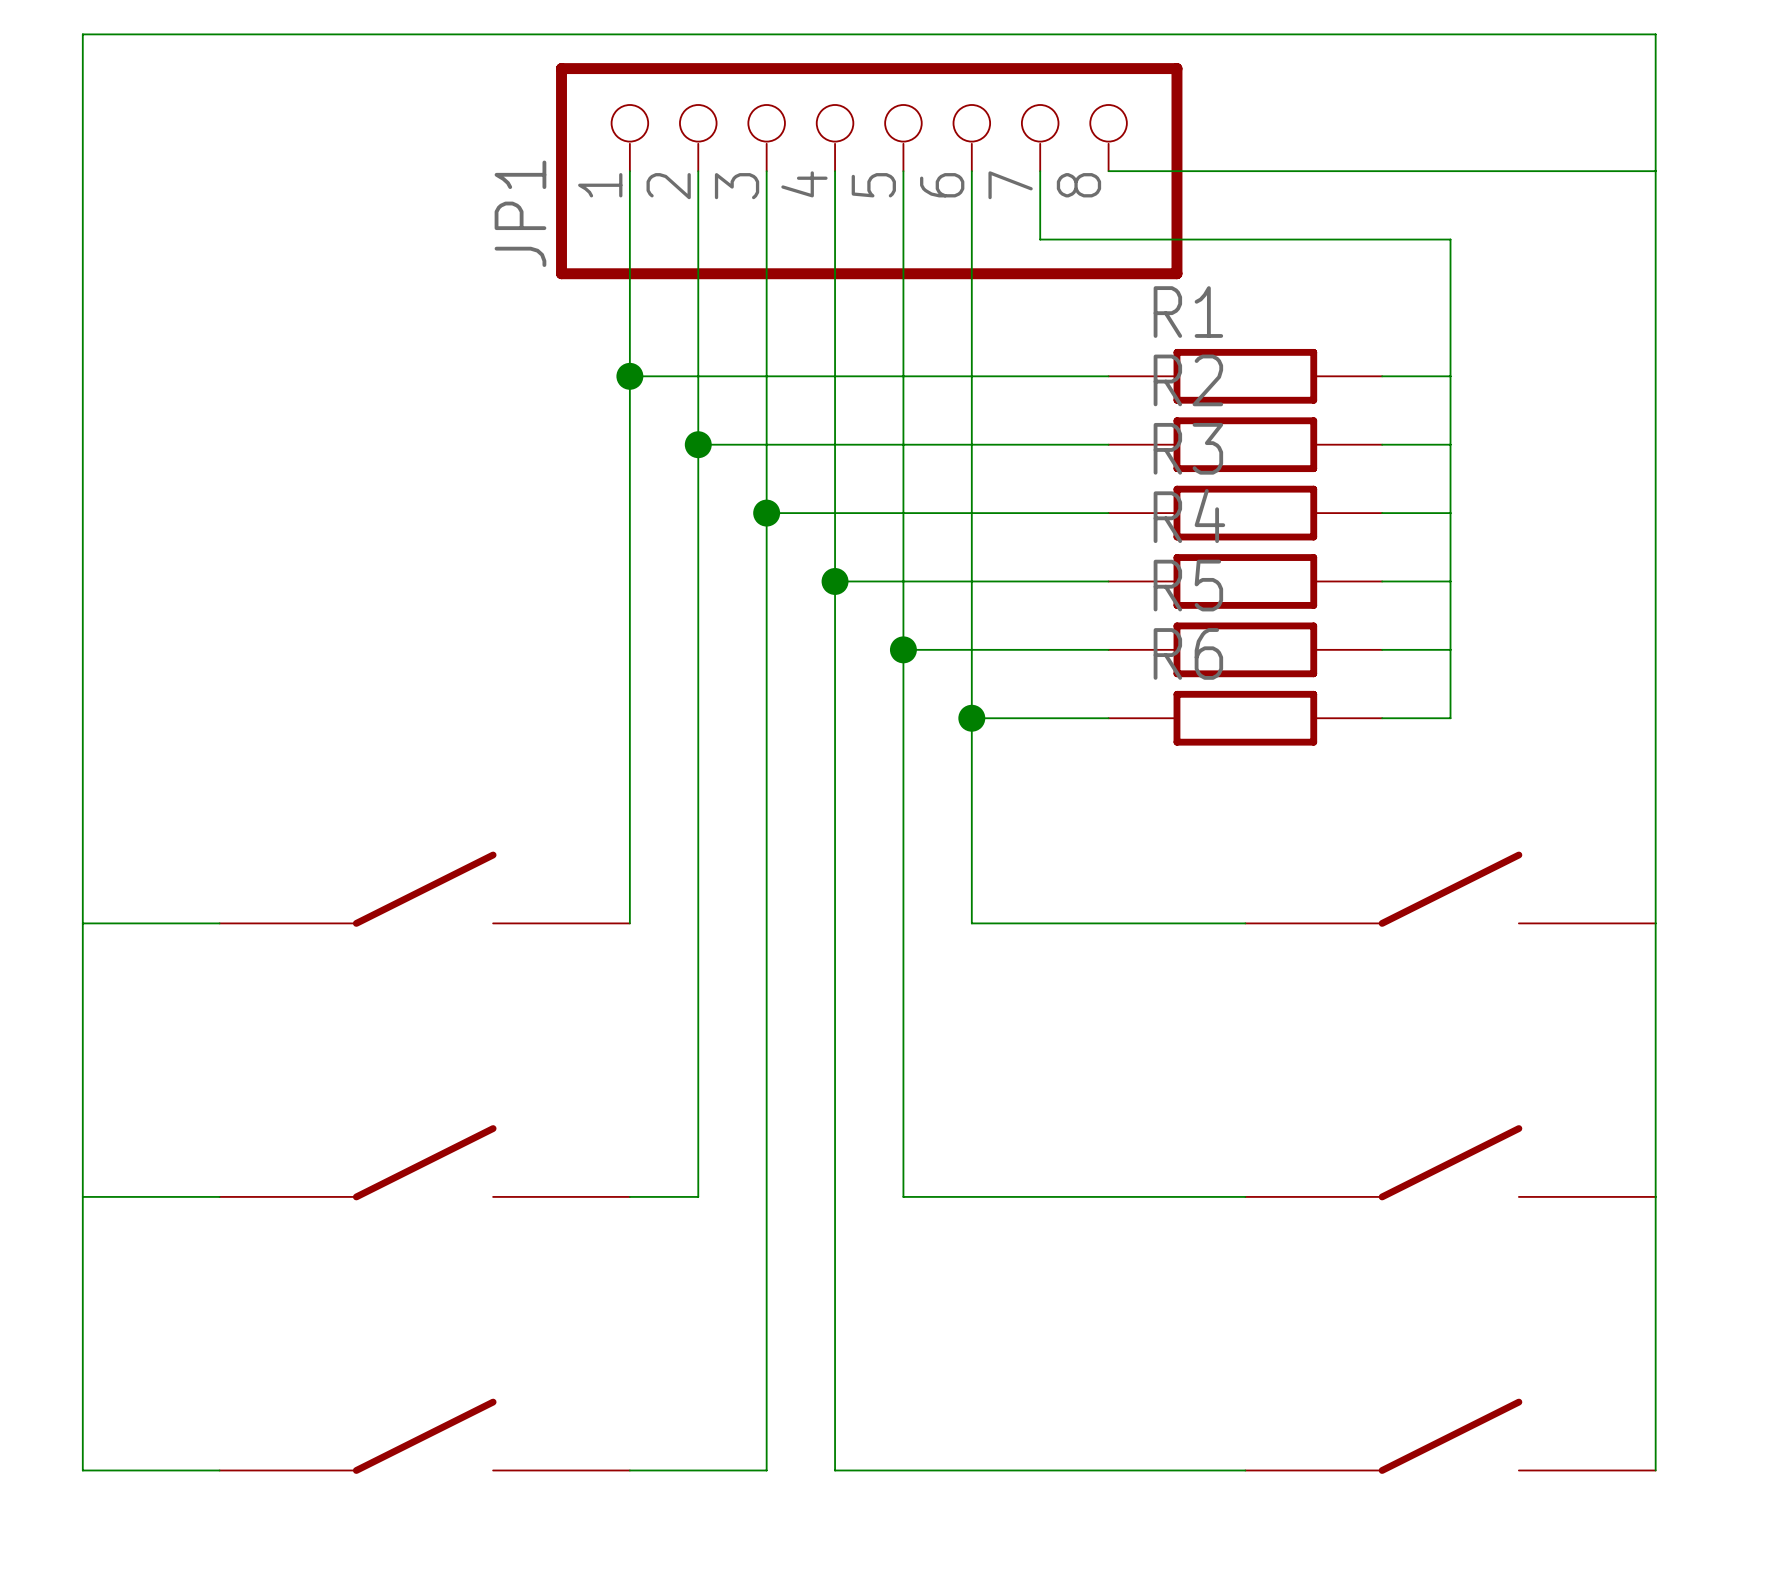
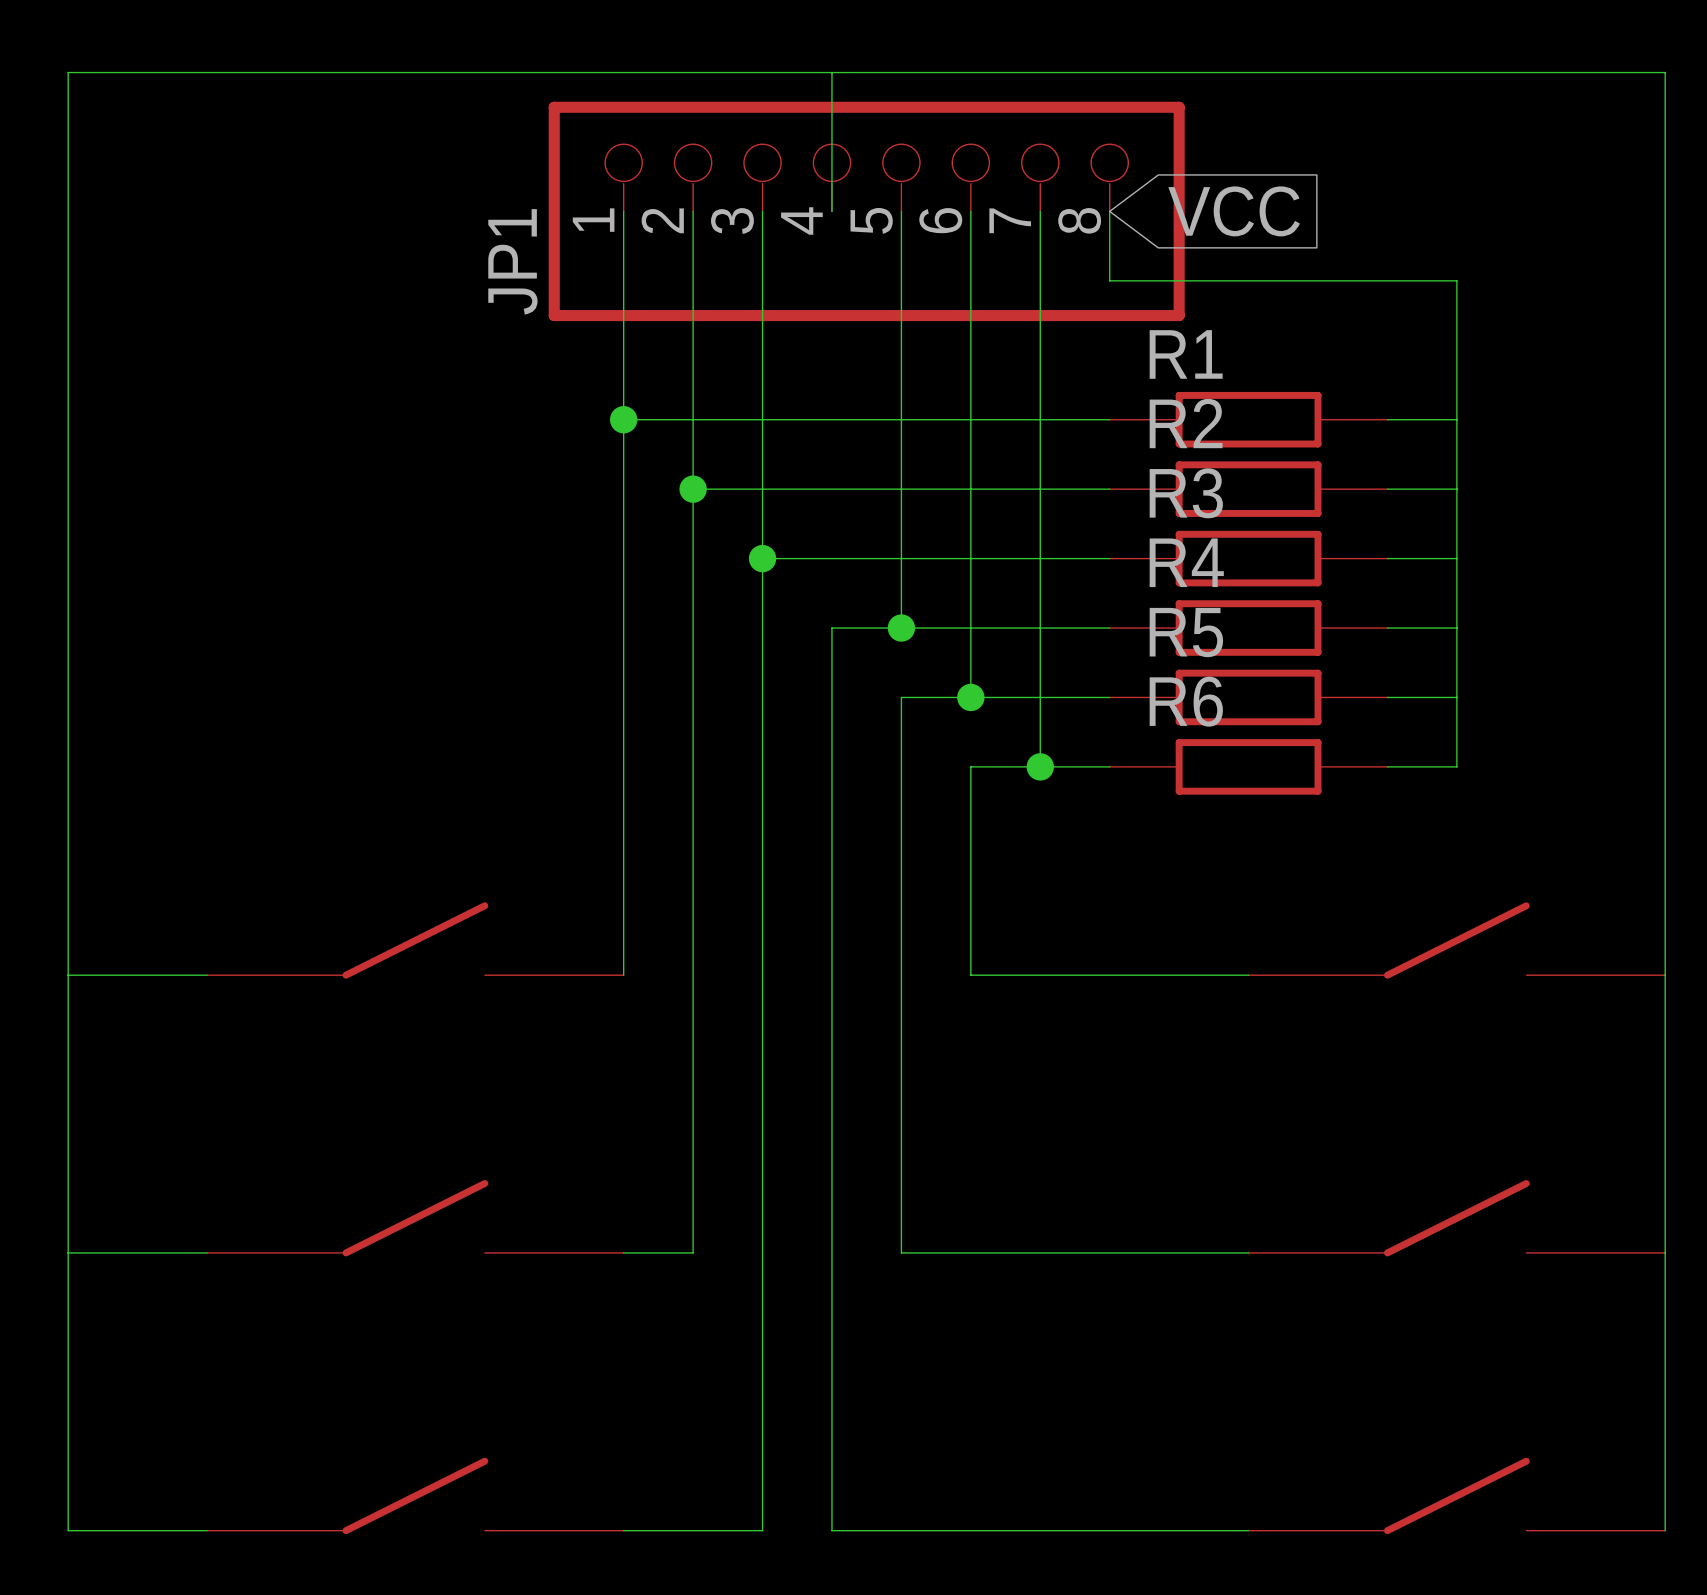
wire: (835, 171) (835, 581) -> (831, 211) (831, 72)
wire: (1108, 171) (1655, 171) -> none
global label: none -> VCC (1234, 211)
wire: (1040, 239) (1108, 239) -> (1109, 211) (1109, 280)
wire: none -> (1040, 280) (1040, 766)
junction: (835, 581) -> none
wire: (903, 581) (903, 649) -> none
junction: none -> (901, 628)
junction: (903, 649) -> none
wire: (971, 649) (971, 718) -> none
junction: none -> (970, 697)
junction: (971, 718) -> none
junction: none -> (1040, 766)

